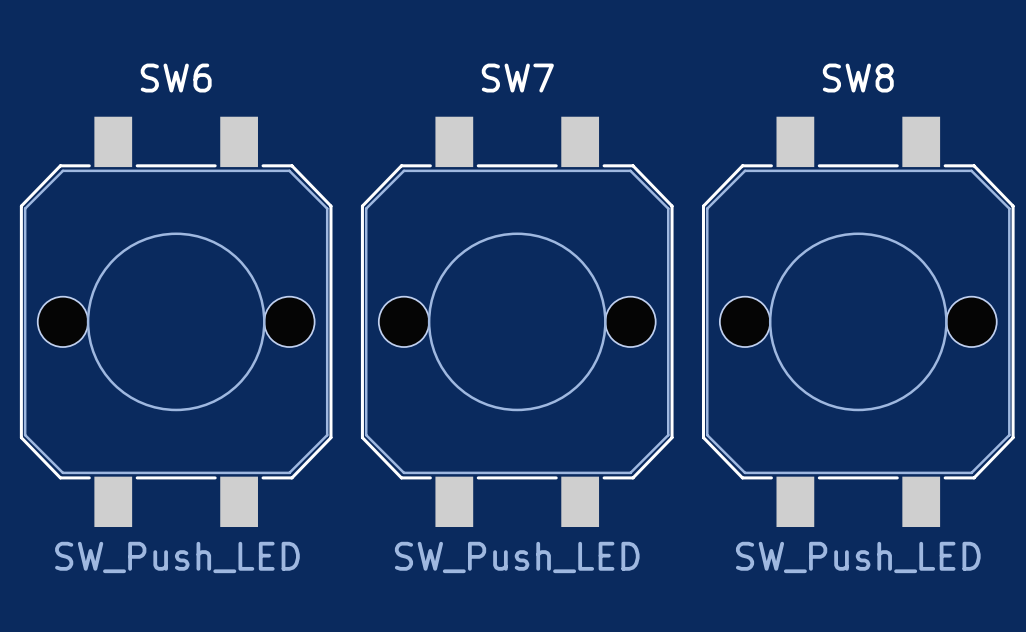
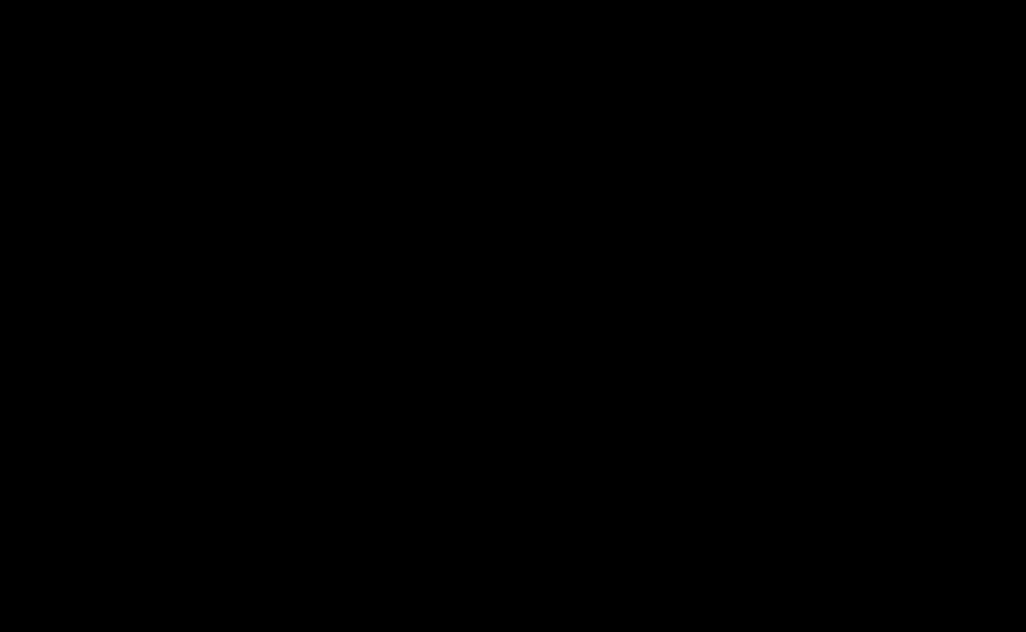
SW6: SW_Push_LED (176, 321) -> none
SW7: SW_Push_LED (517, 321) -> none
SW8: SW_Push_LED (858, 321) -> none

